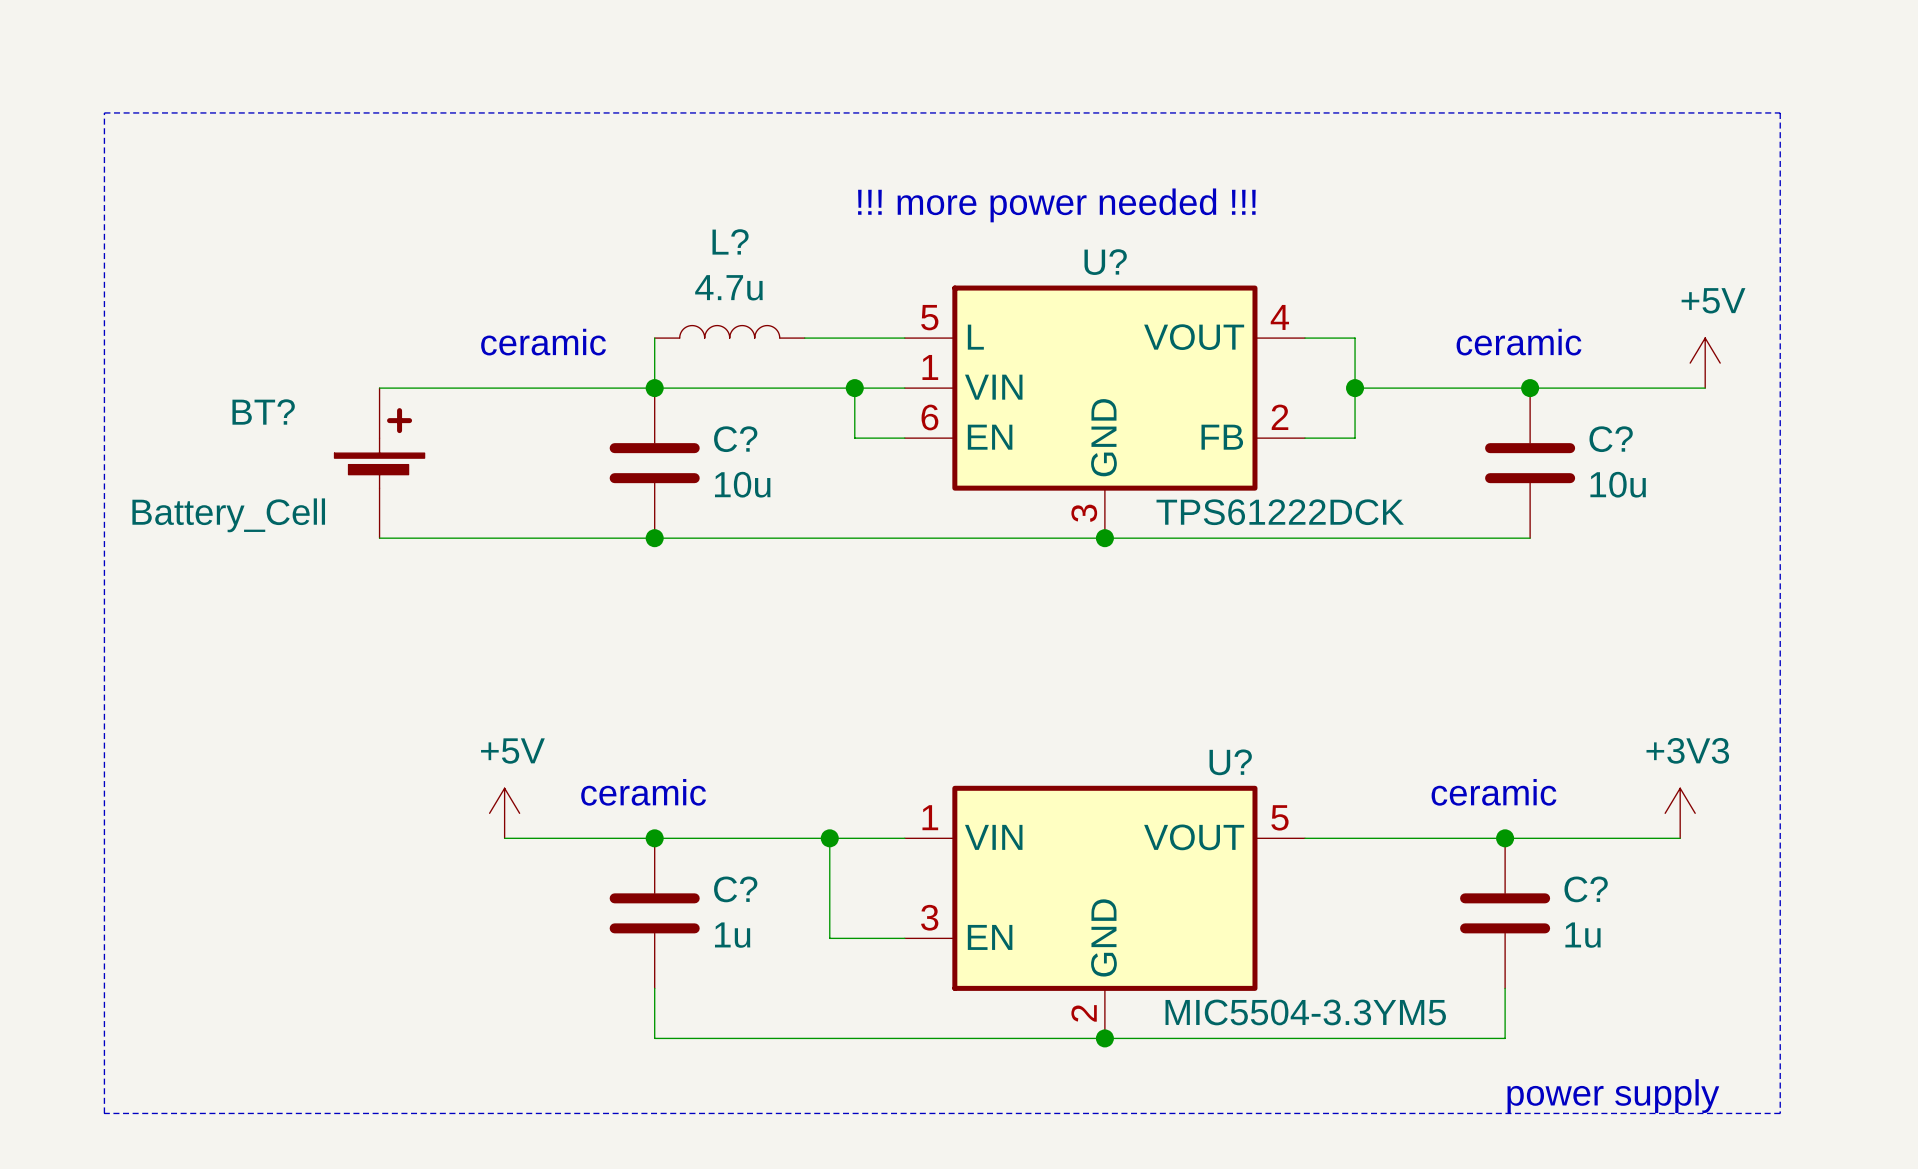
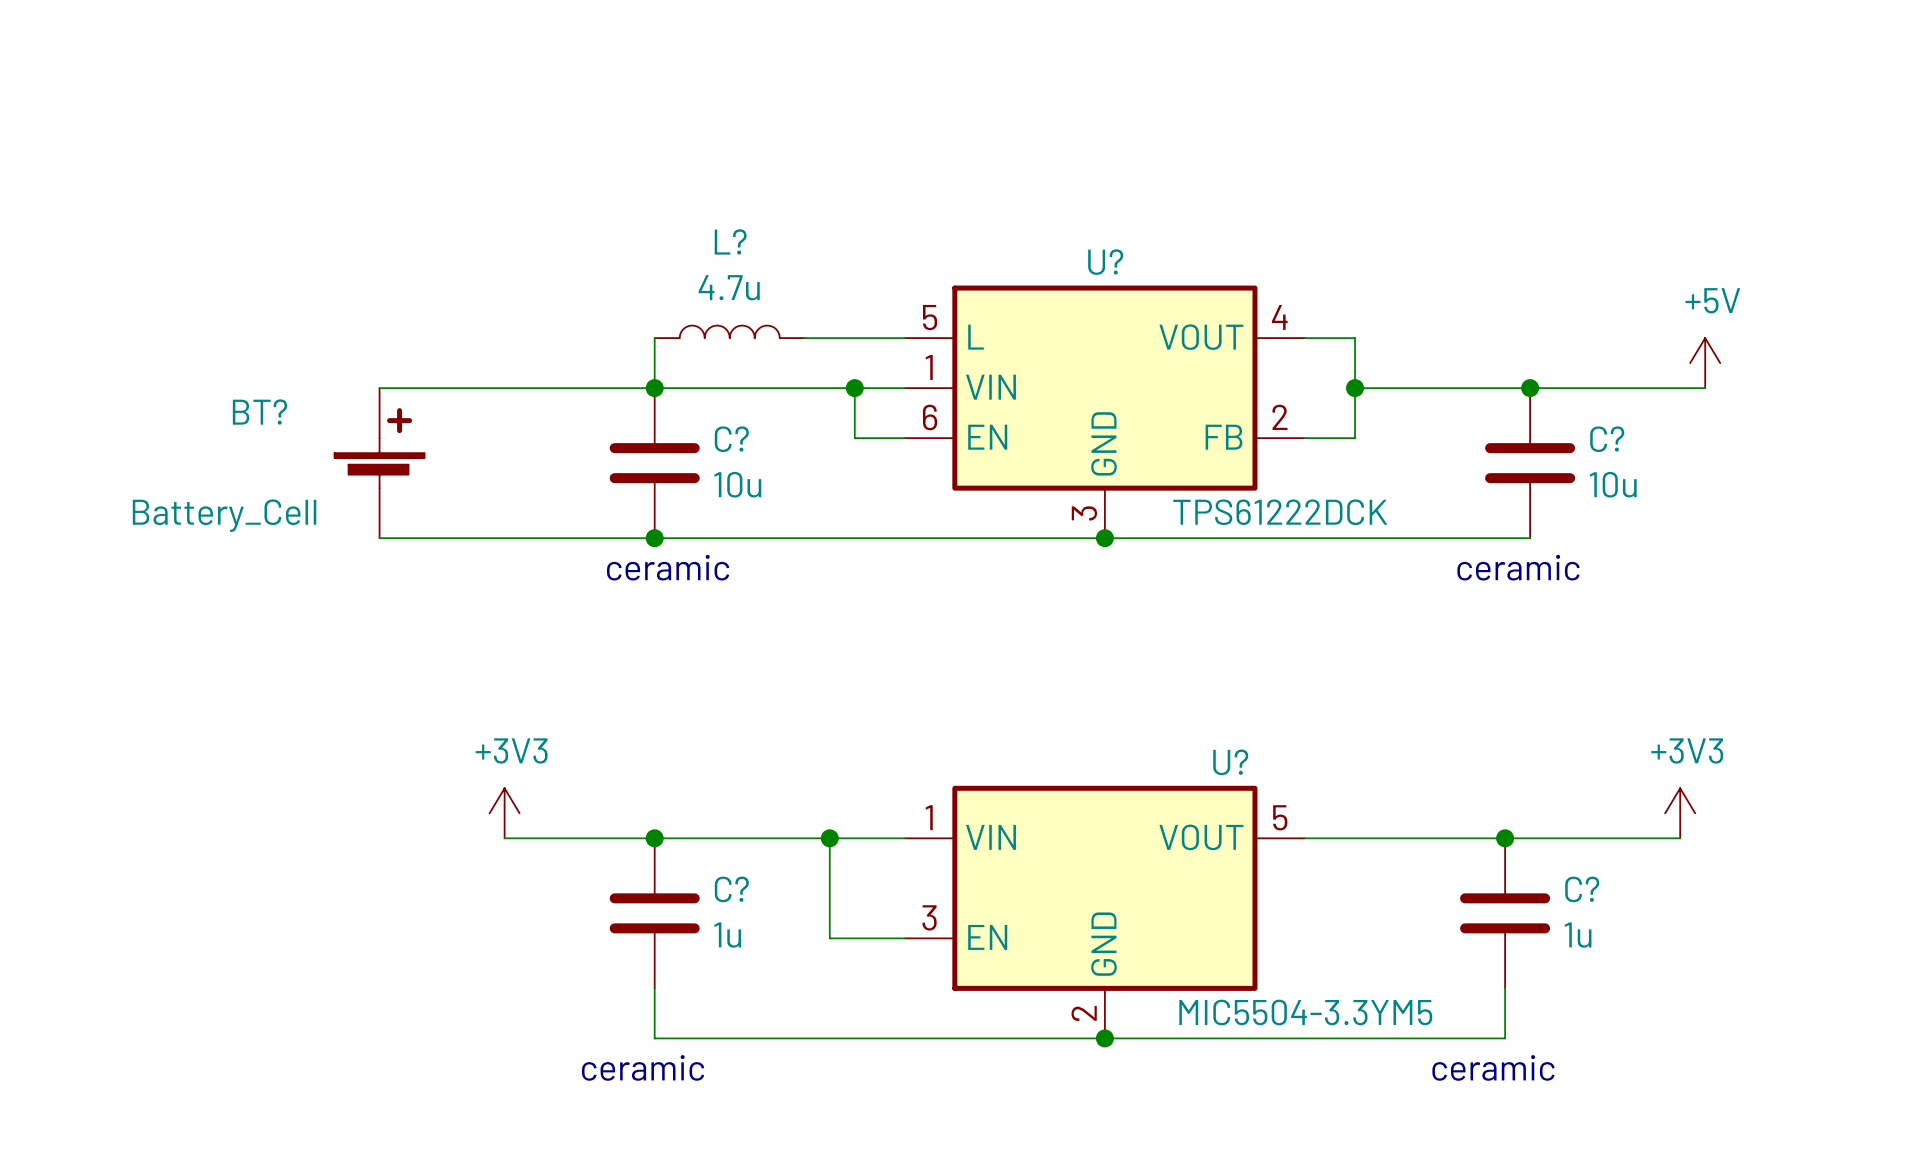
line: (104, 112) (1780, 112) (1780, 1113) (104, 1113) (104, 112) -> none
text: !!! more power needed !!! (1056, 205) -> none
text: ceramic (543, 342) -> none
text: ceramic (1519, 342) -> none
text: none -> ceramic (668, 567)
text: none -> ceramic (1518, 567)
text: ceramic (643, 792) -> none
text: ceramic (1493, 792) -> none
power symbol: +5V (504, 813) -> +3V3 (504, 813)
text: none -> ceramic (643, 1067)
text: none -> ceramic (1493, 1067)
text: power supply (1613, 1096) -> none

